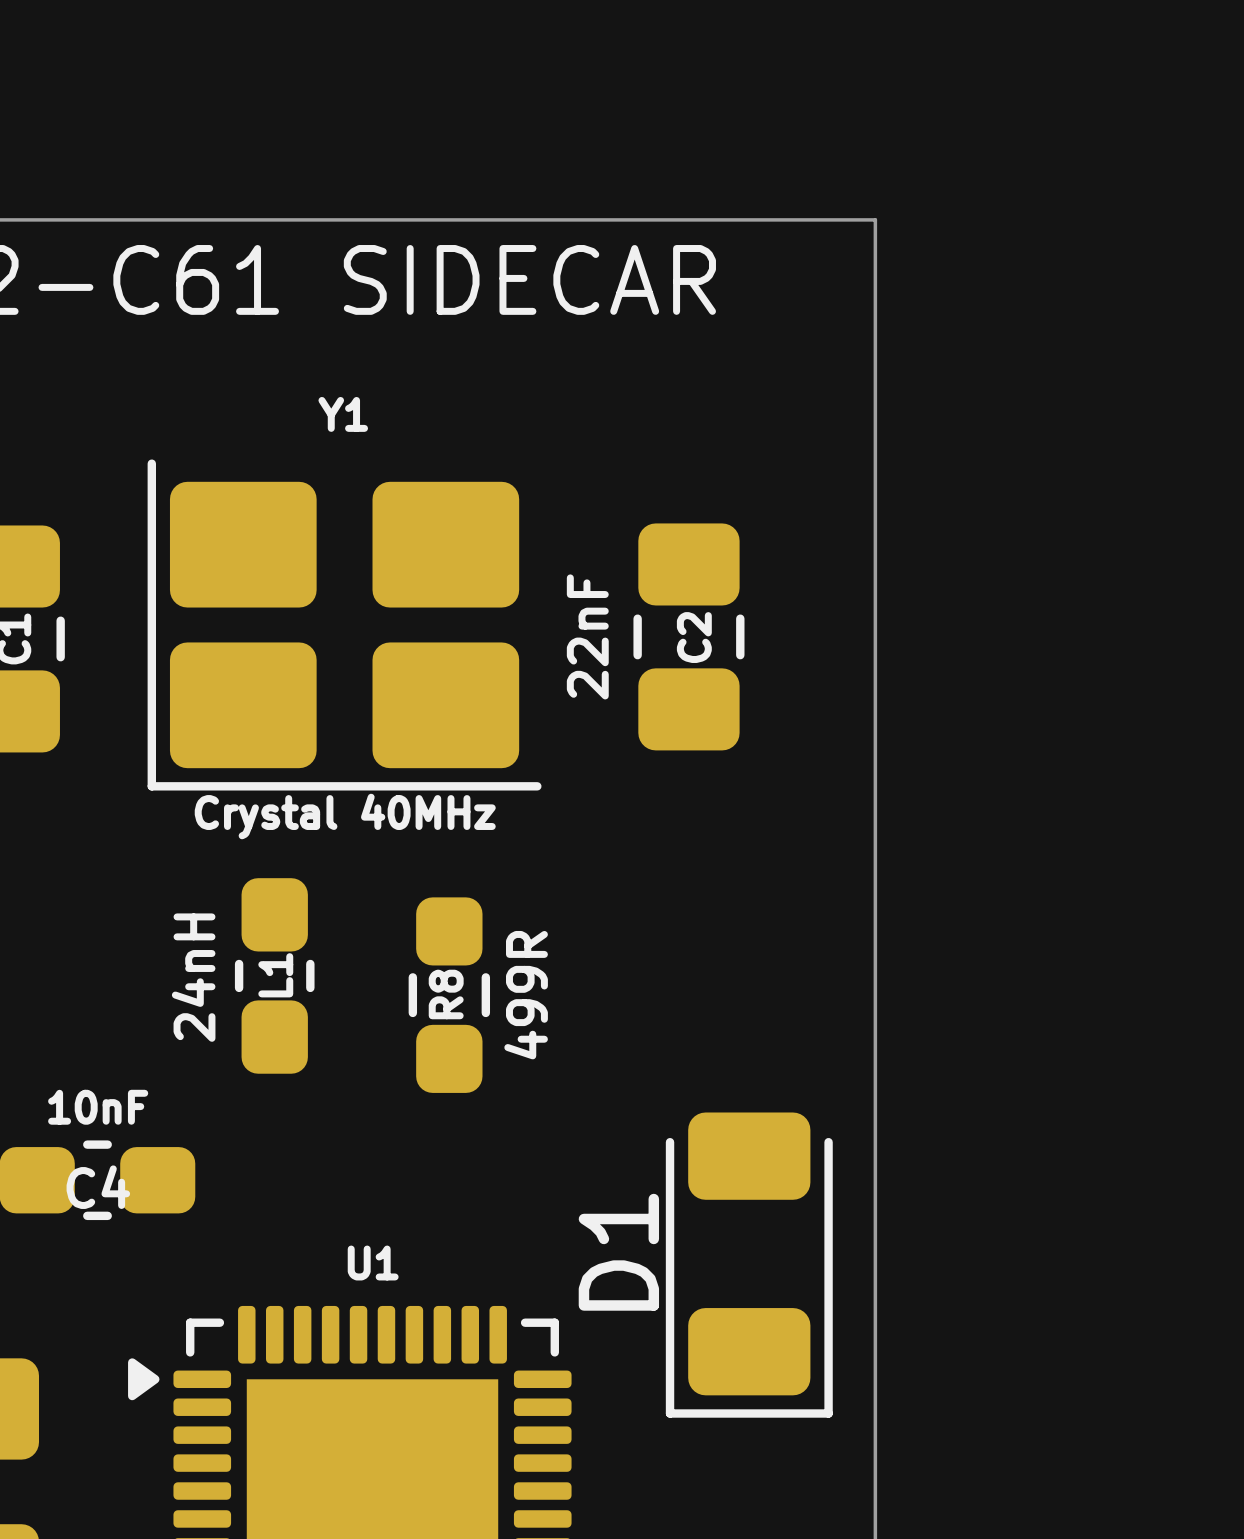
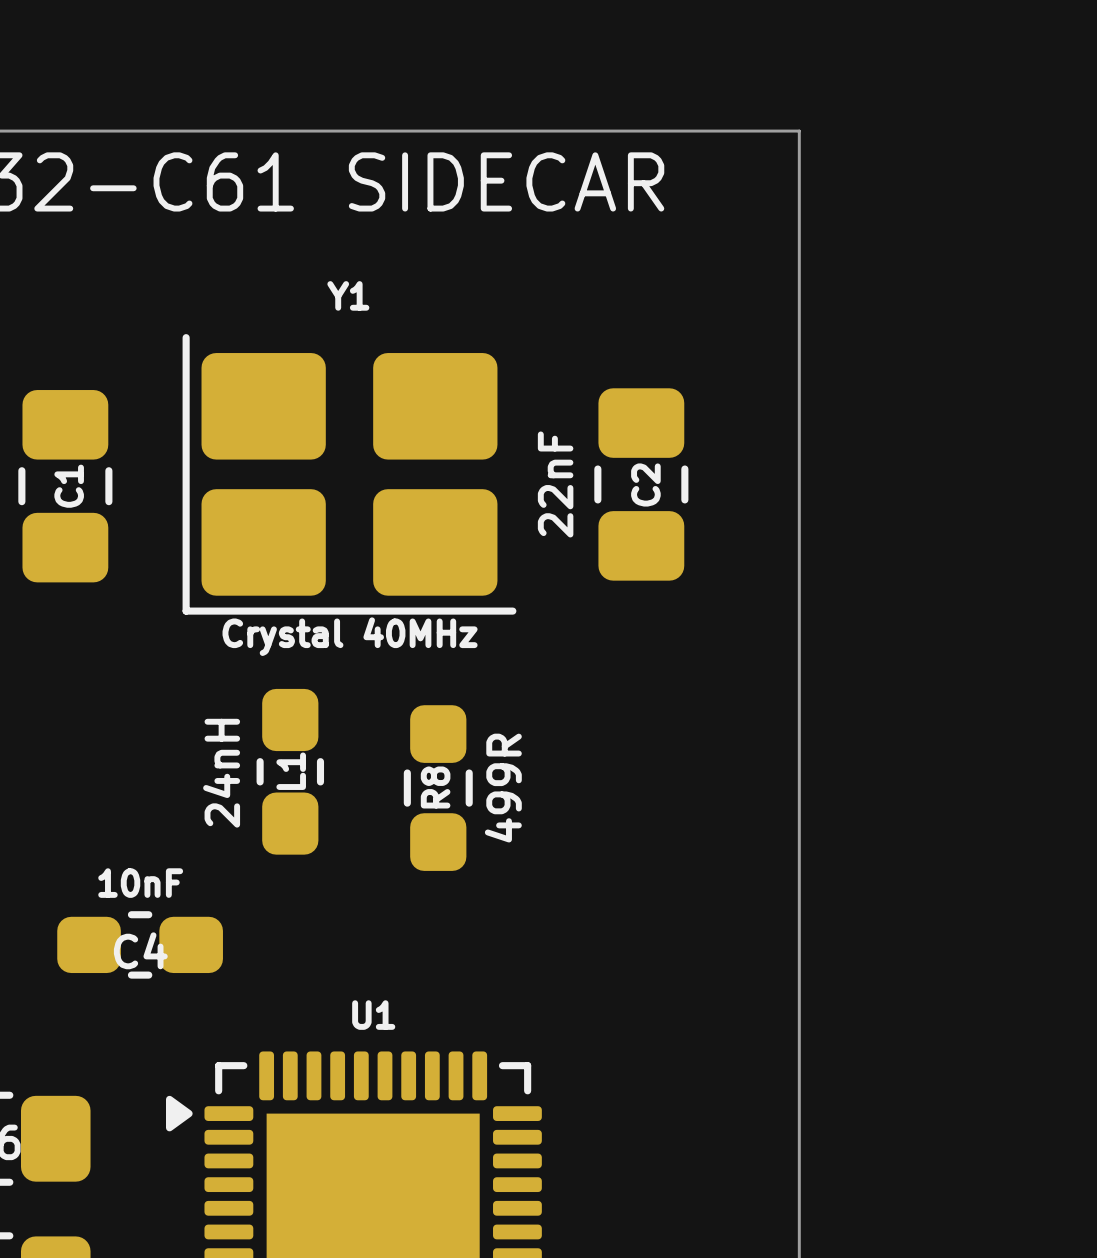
D1: (749, 1265) -> none

